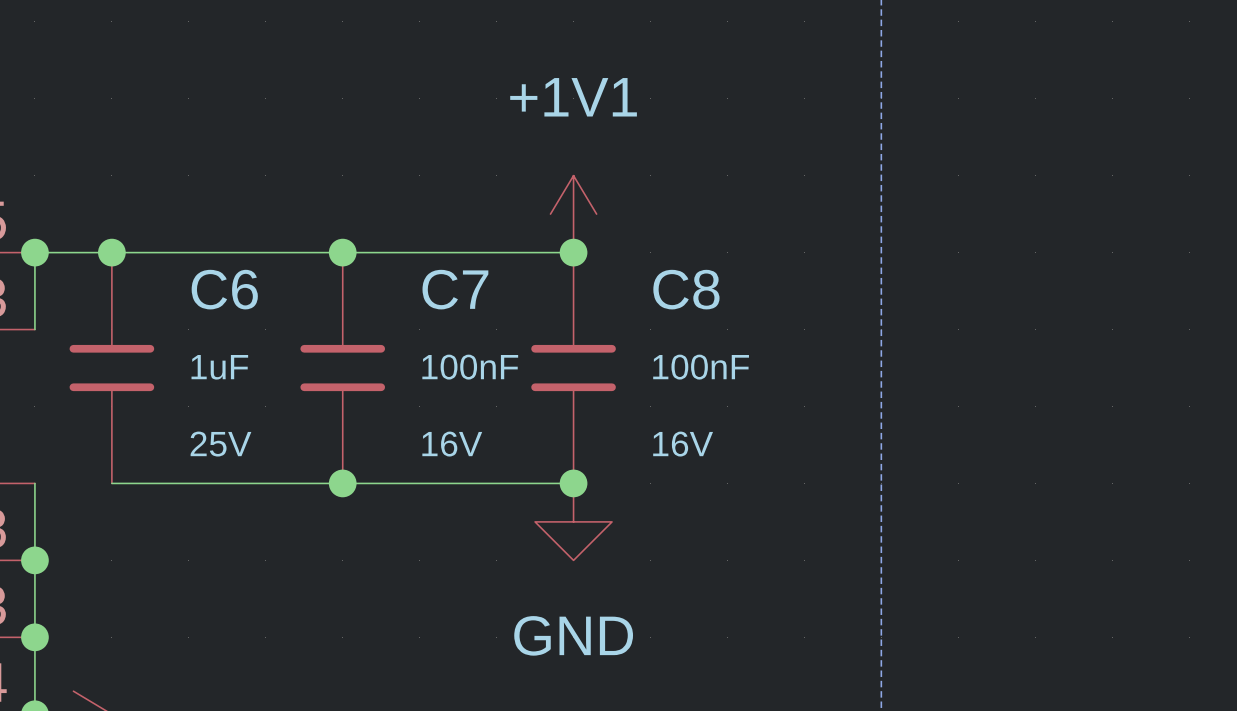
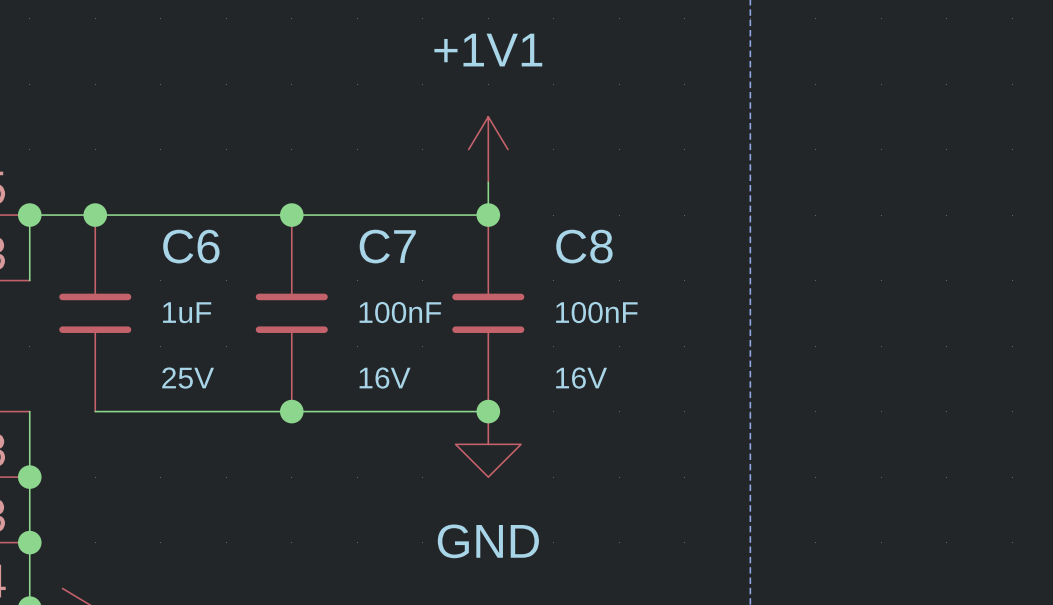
power symbol position: +1V1 (573, 214) -> +1V1 (488, 149)

